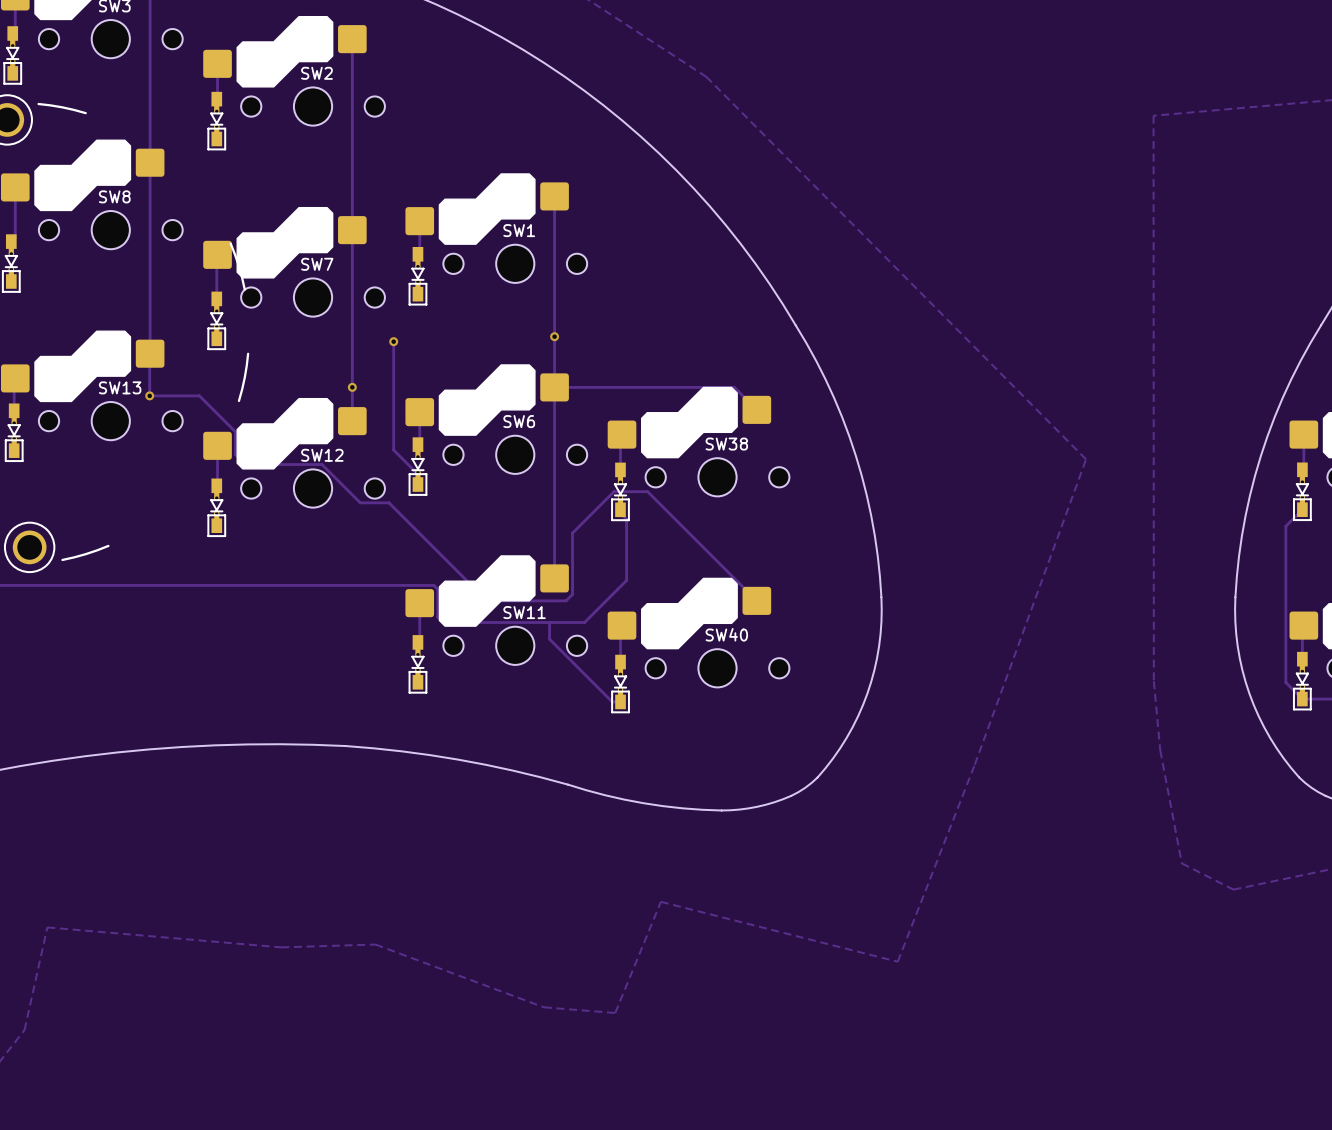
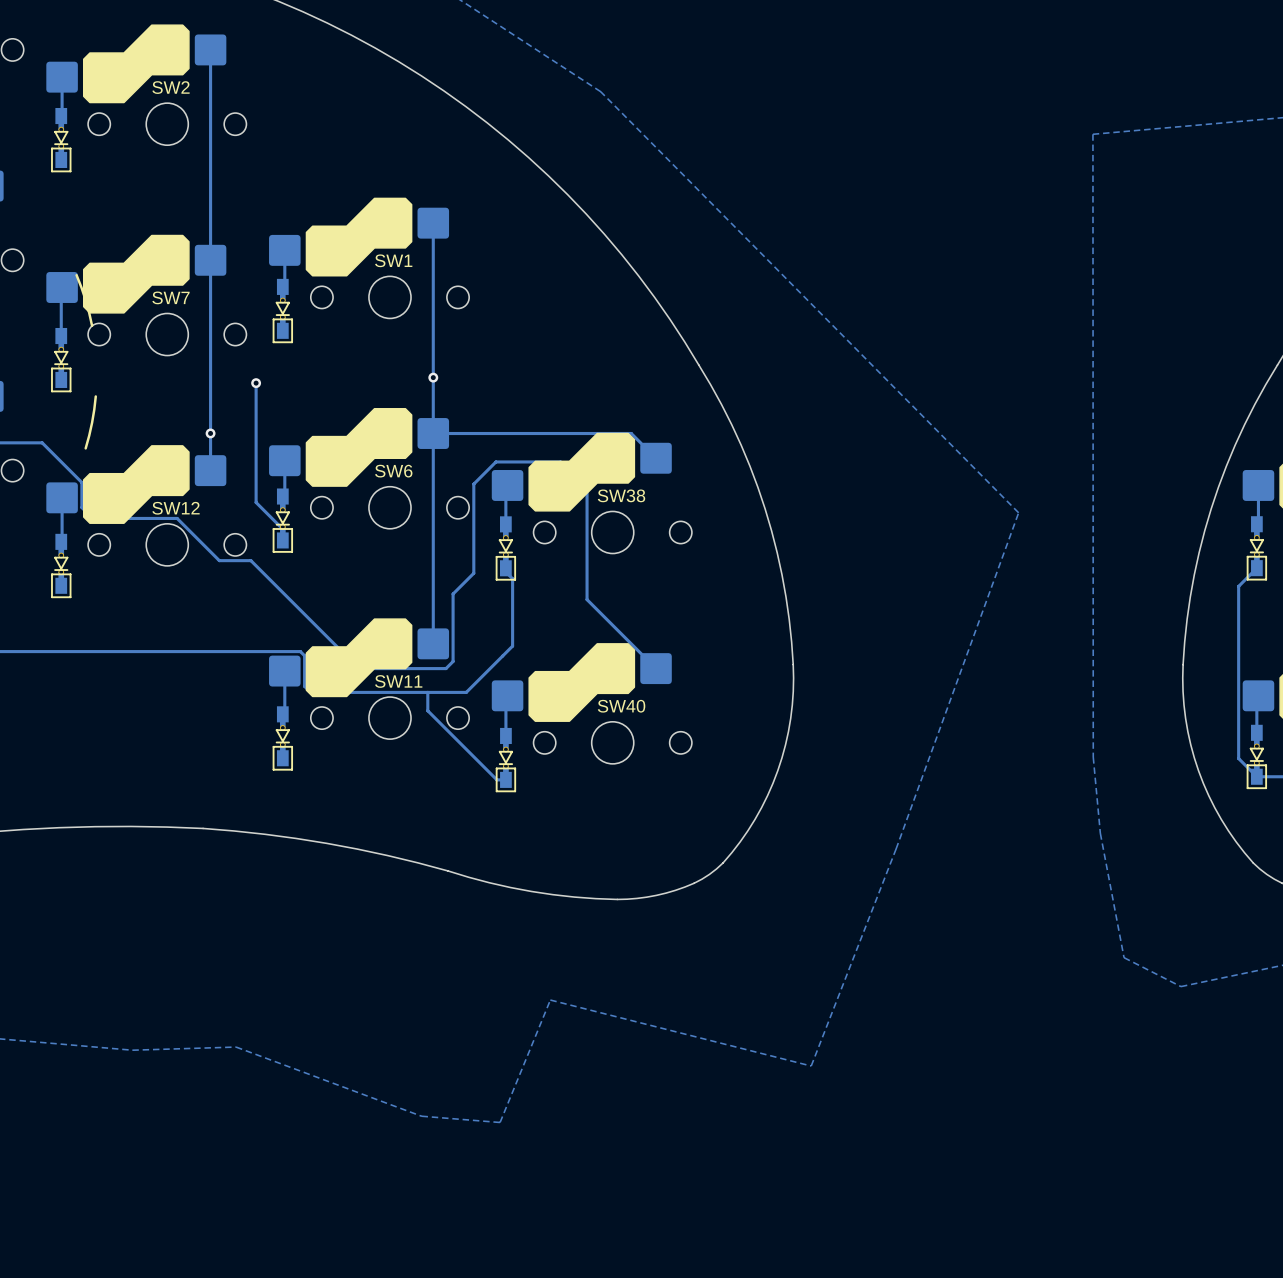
track: (591, 514) (614, 491) (647, 491) (694, 538) -> (473, 573) (473, 484) (495, 461) (560, 461) (587, 488) (587, 599)

